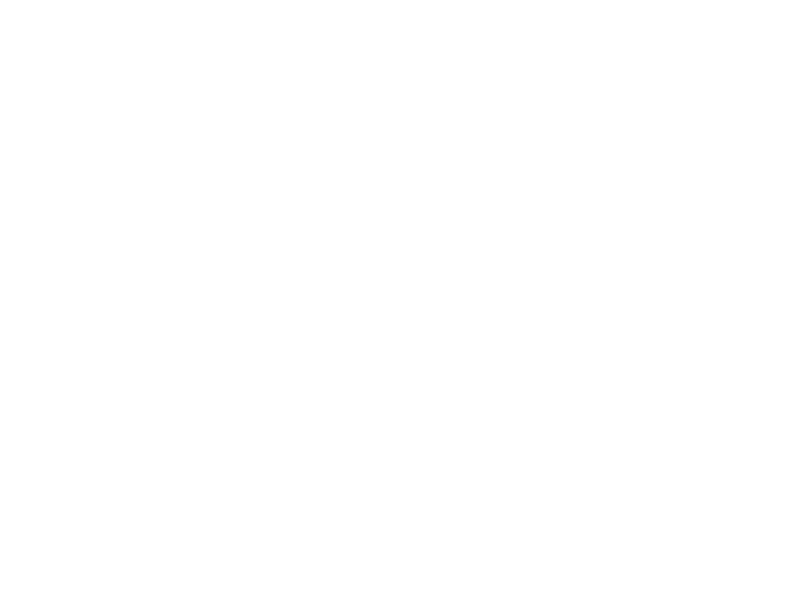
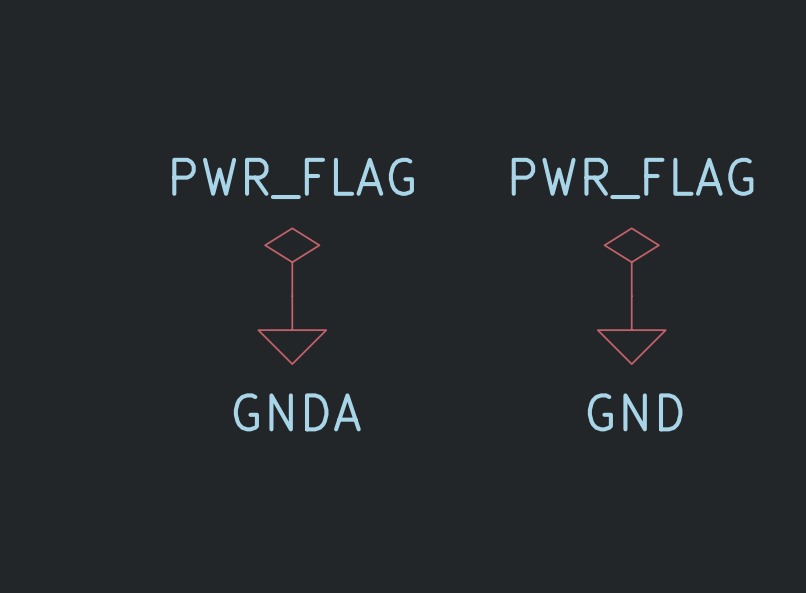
power symbol: none -> PWR_FLAG (292, 262)
power symbol: none -> PWR_FLAG (631, 262)
power symbol: none -> GNDA (292, 330)
power symbol: none -> GND (631, 330)

